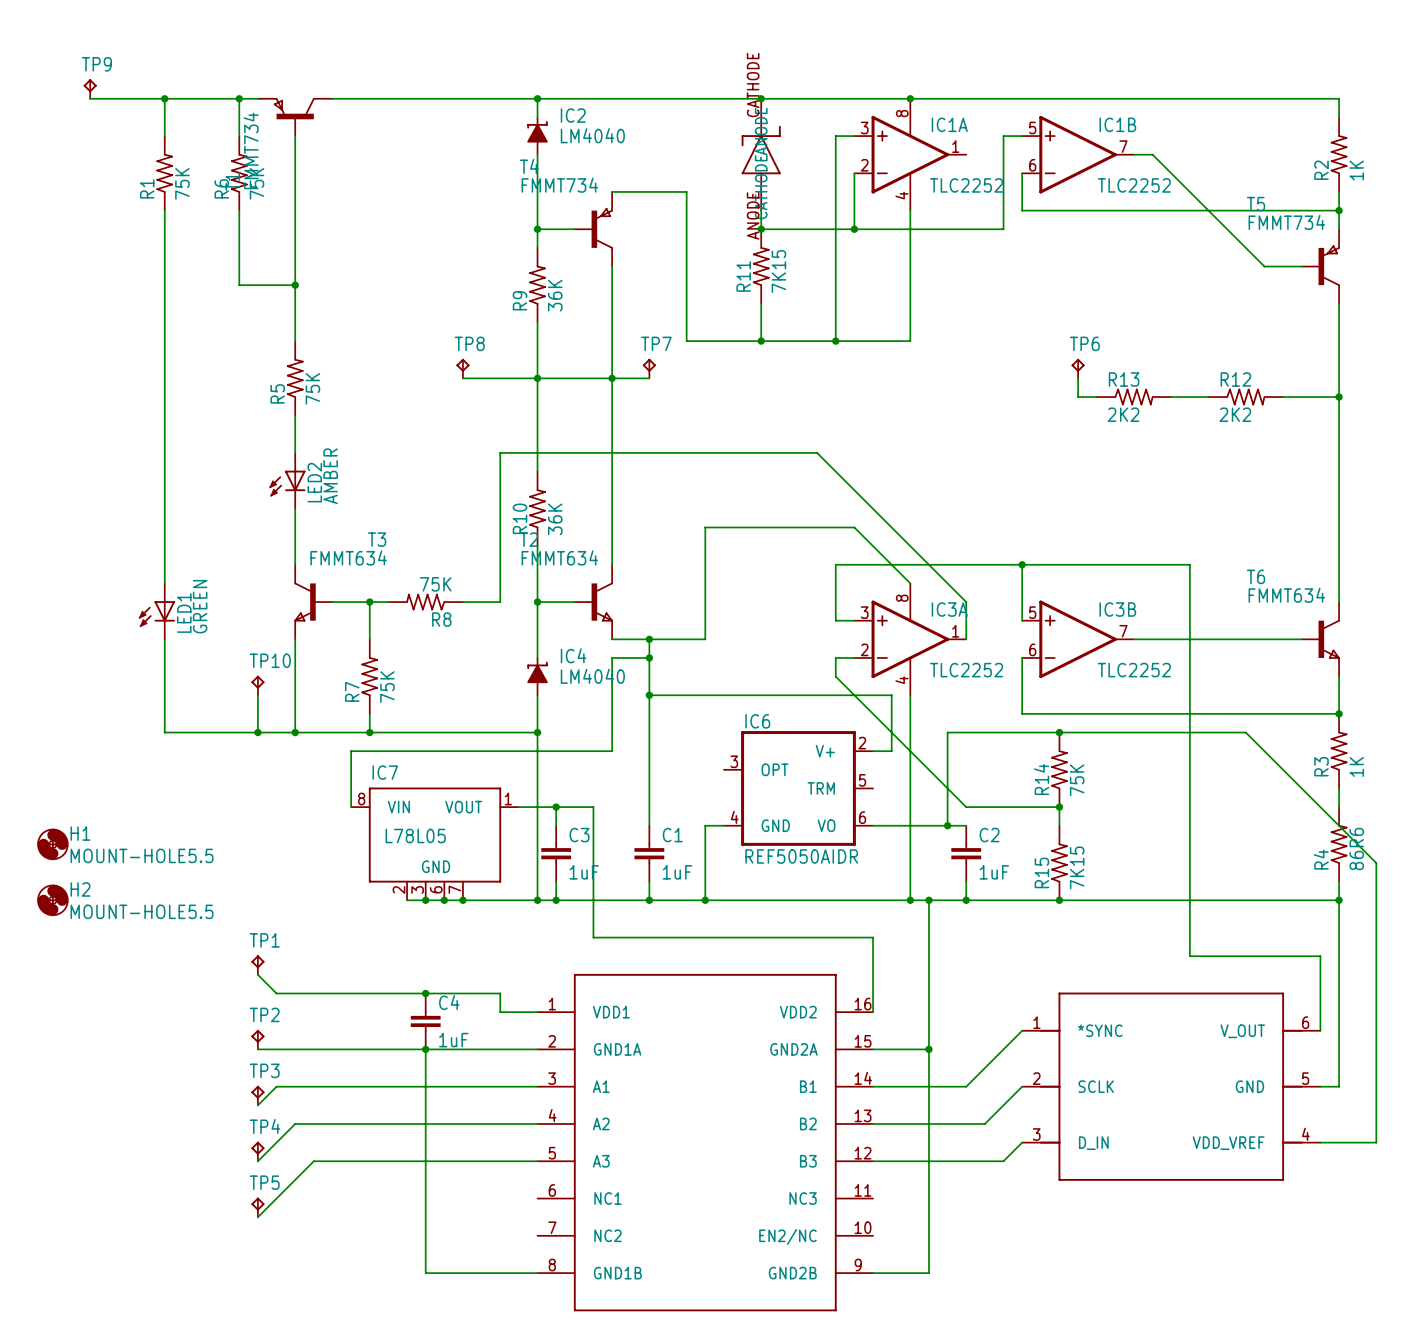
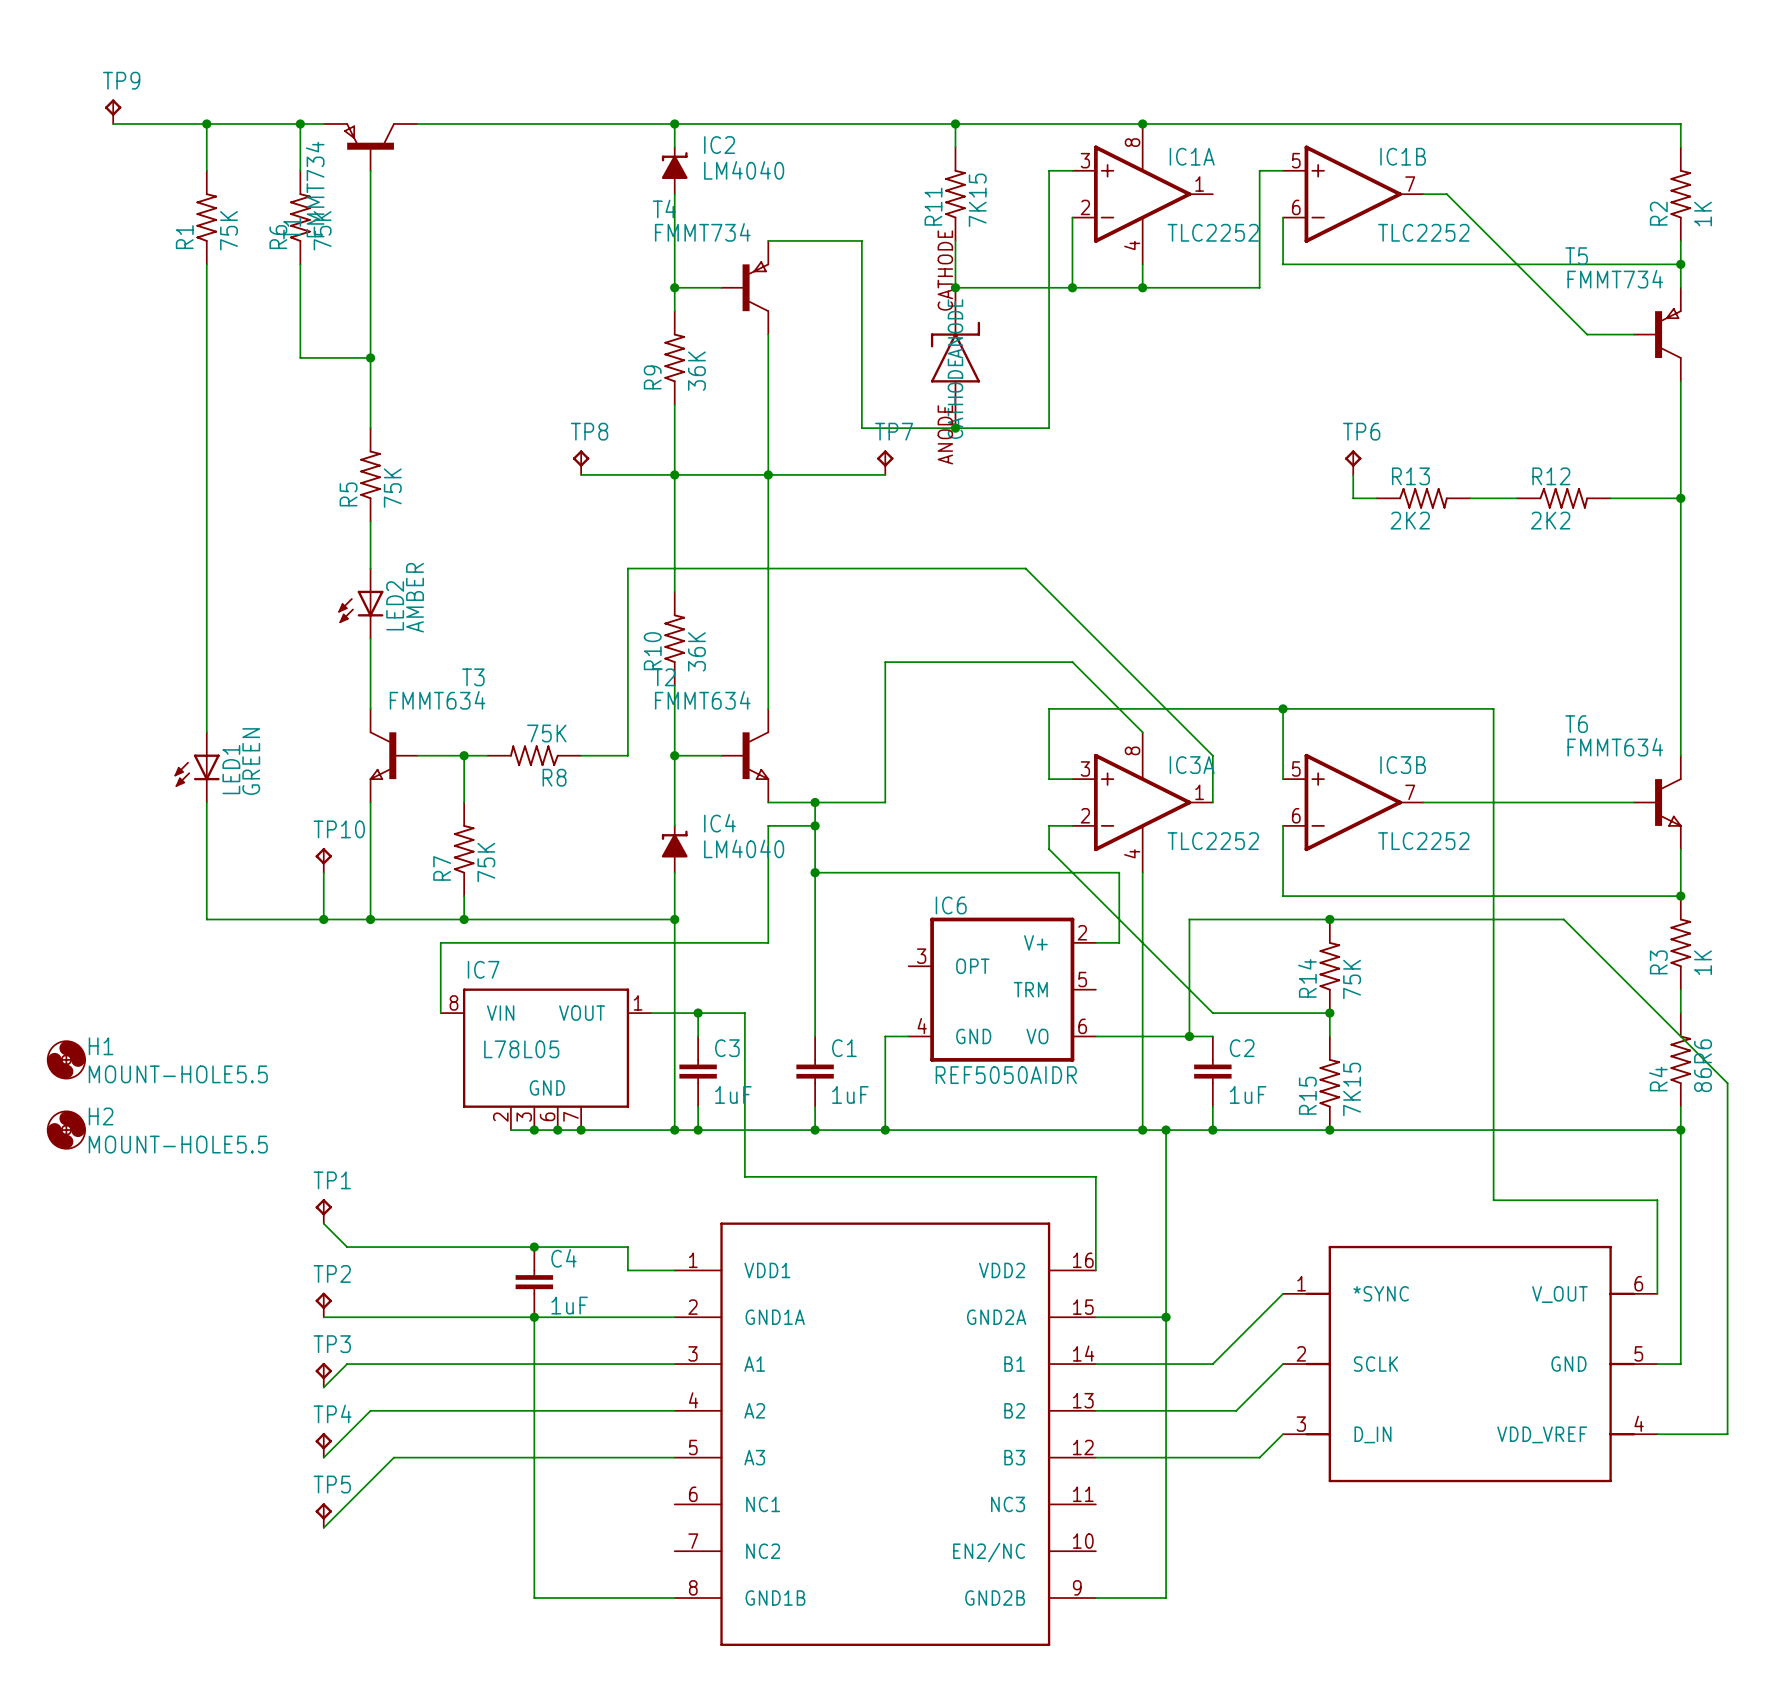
part position: (761, 154) -> (955, 357)
wire: (910, 229) (910, 341) (835, 341) -> none
junction: none -> (1142, 287)
R11 position: (761, 266) -> (955, 194)
junction: (835, 341) -> none
TP7 position: (649, 368) -> (885, 462)
wire: none -> (815, 474) (885, 474)

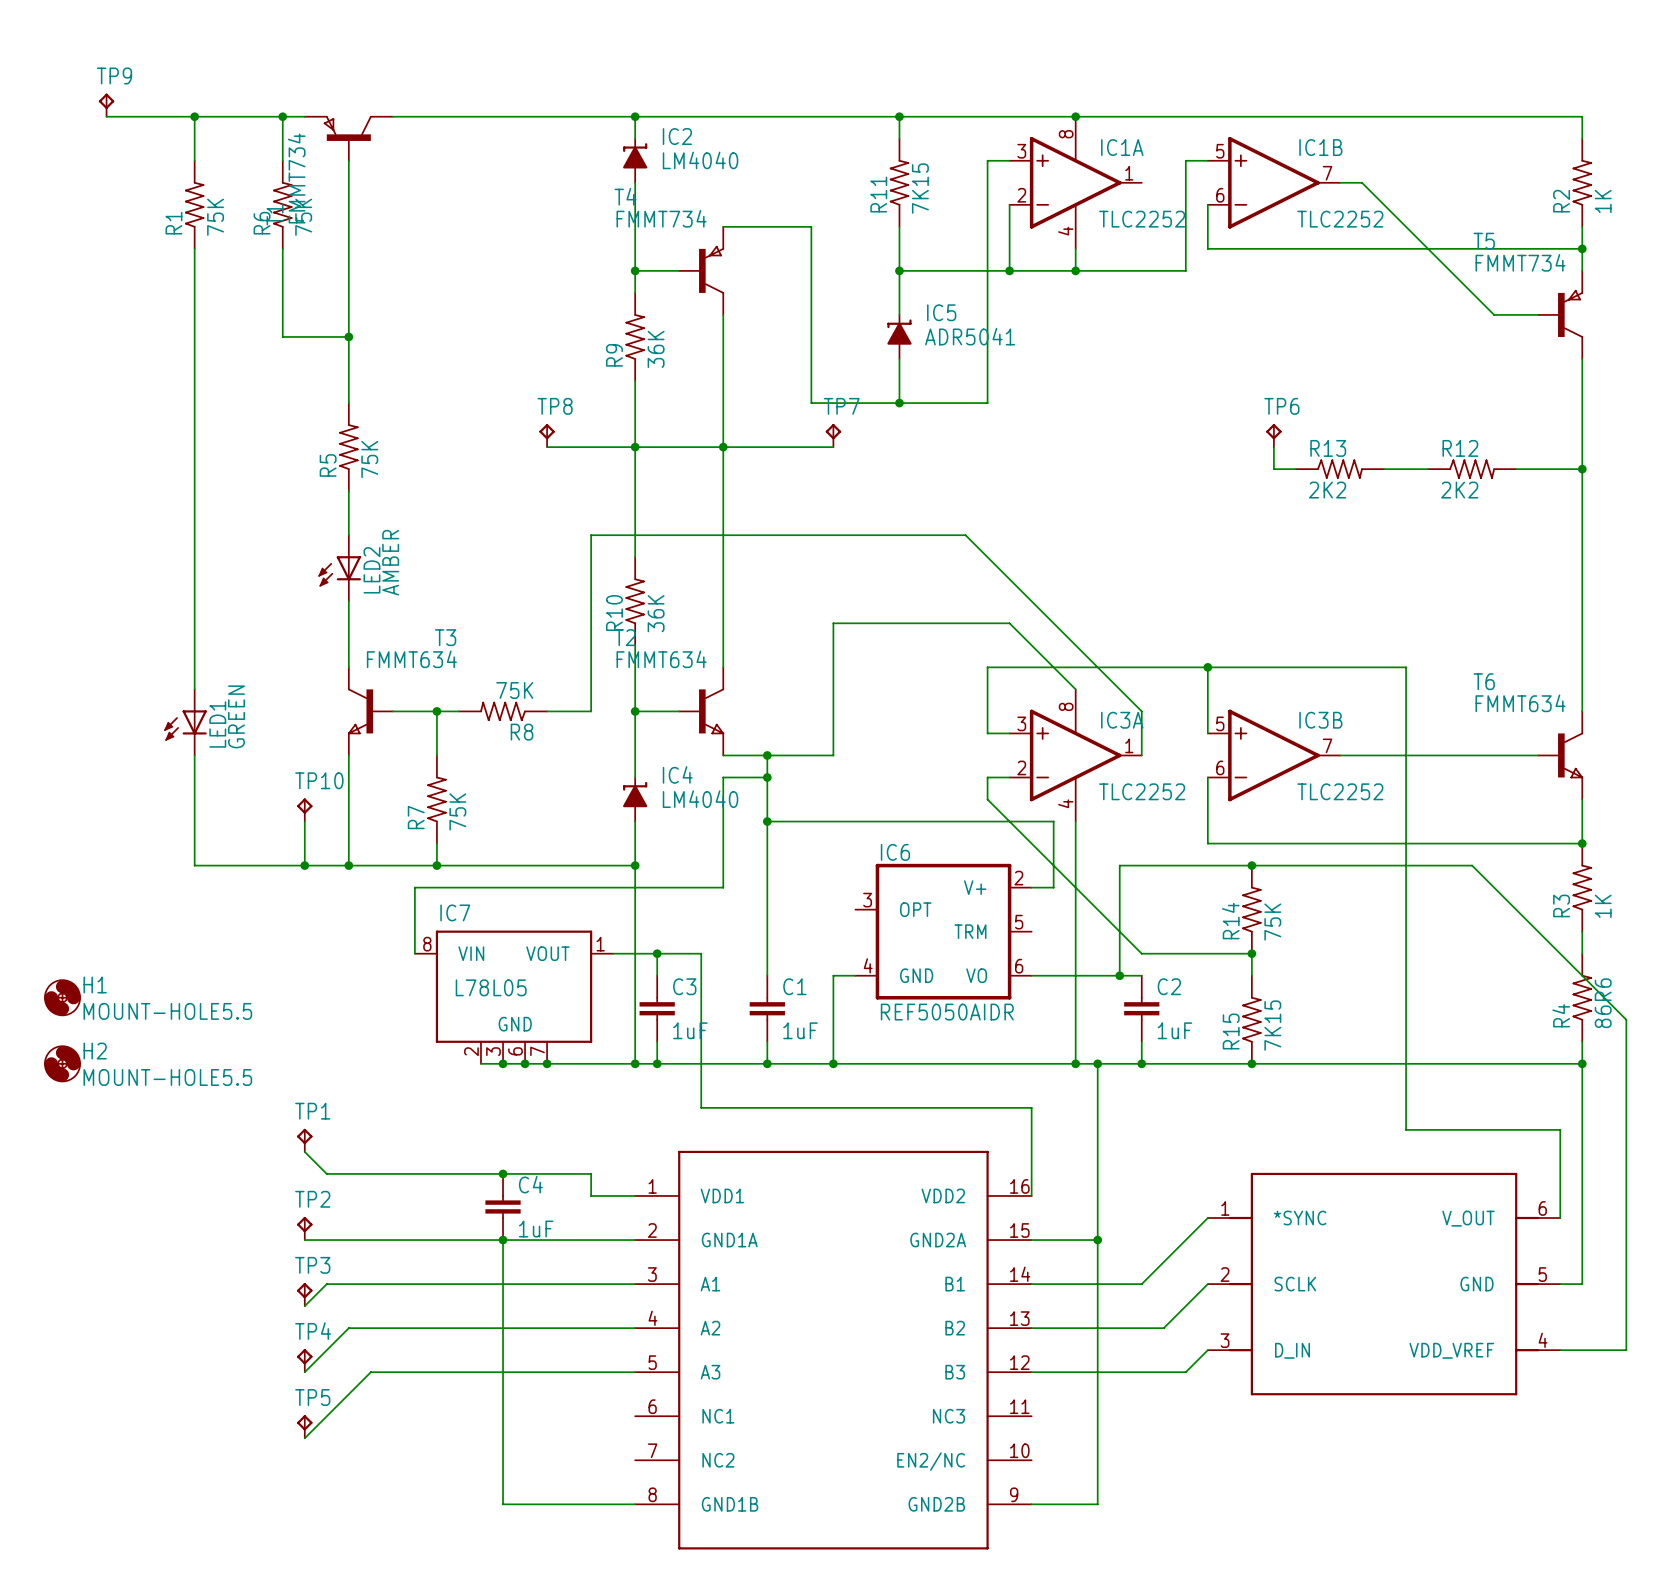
part: (955, 357) -> none
IC5: none -> ADR5041 (899, 336)

